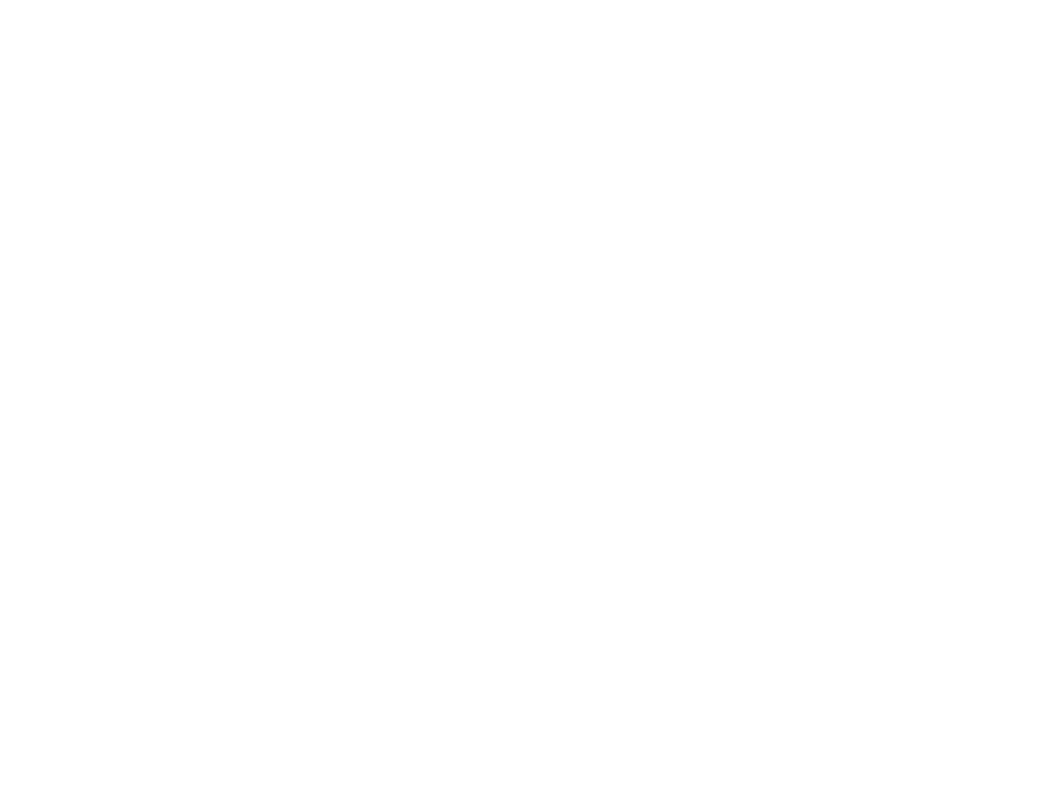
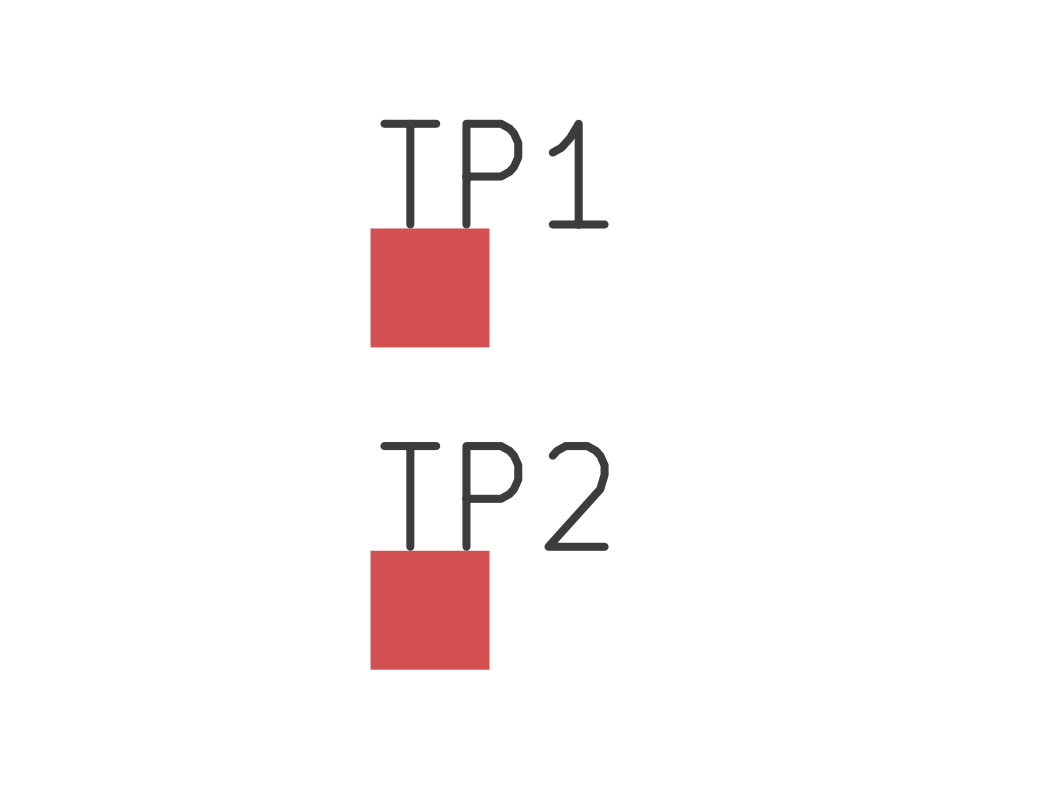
TP1: none -> (430, 287)
TP2: none -> (430, 610)

